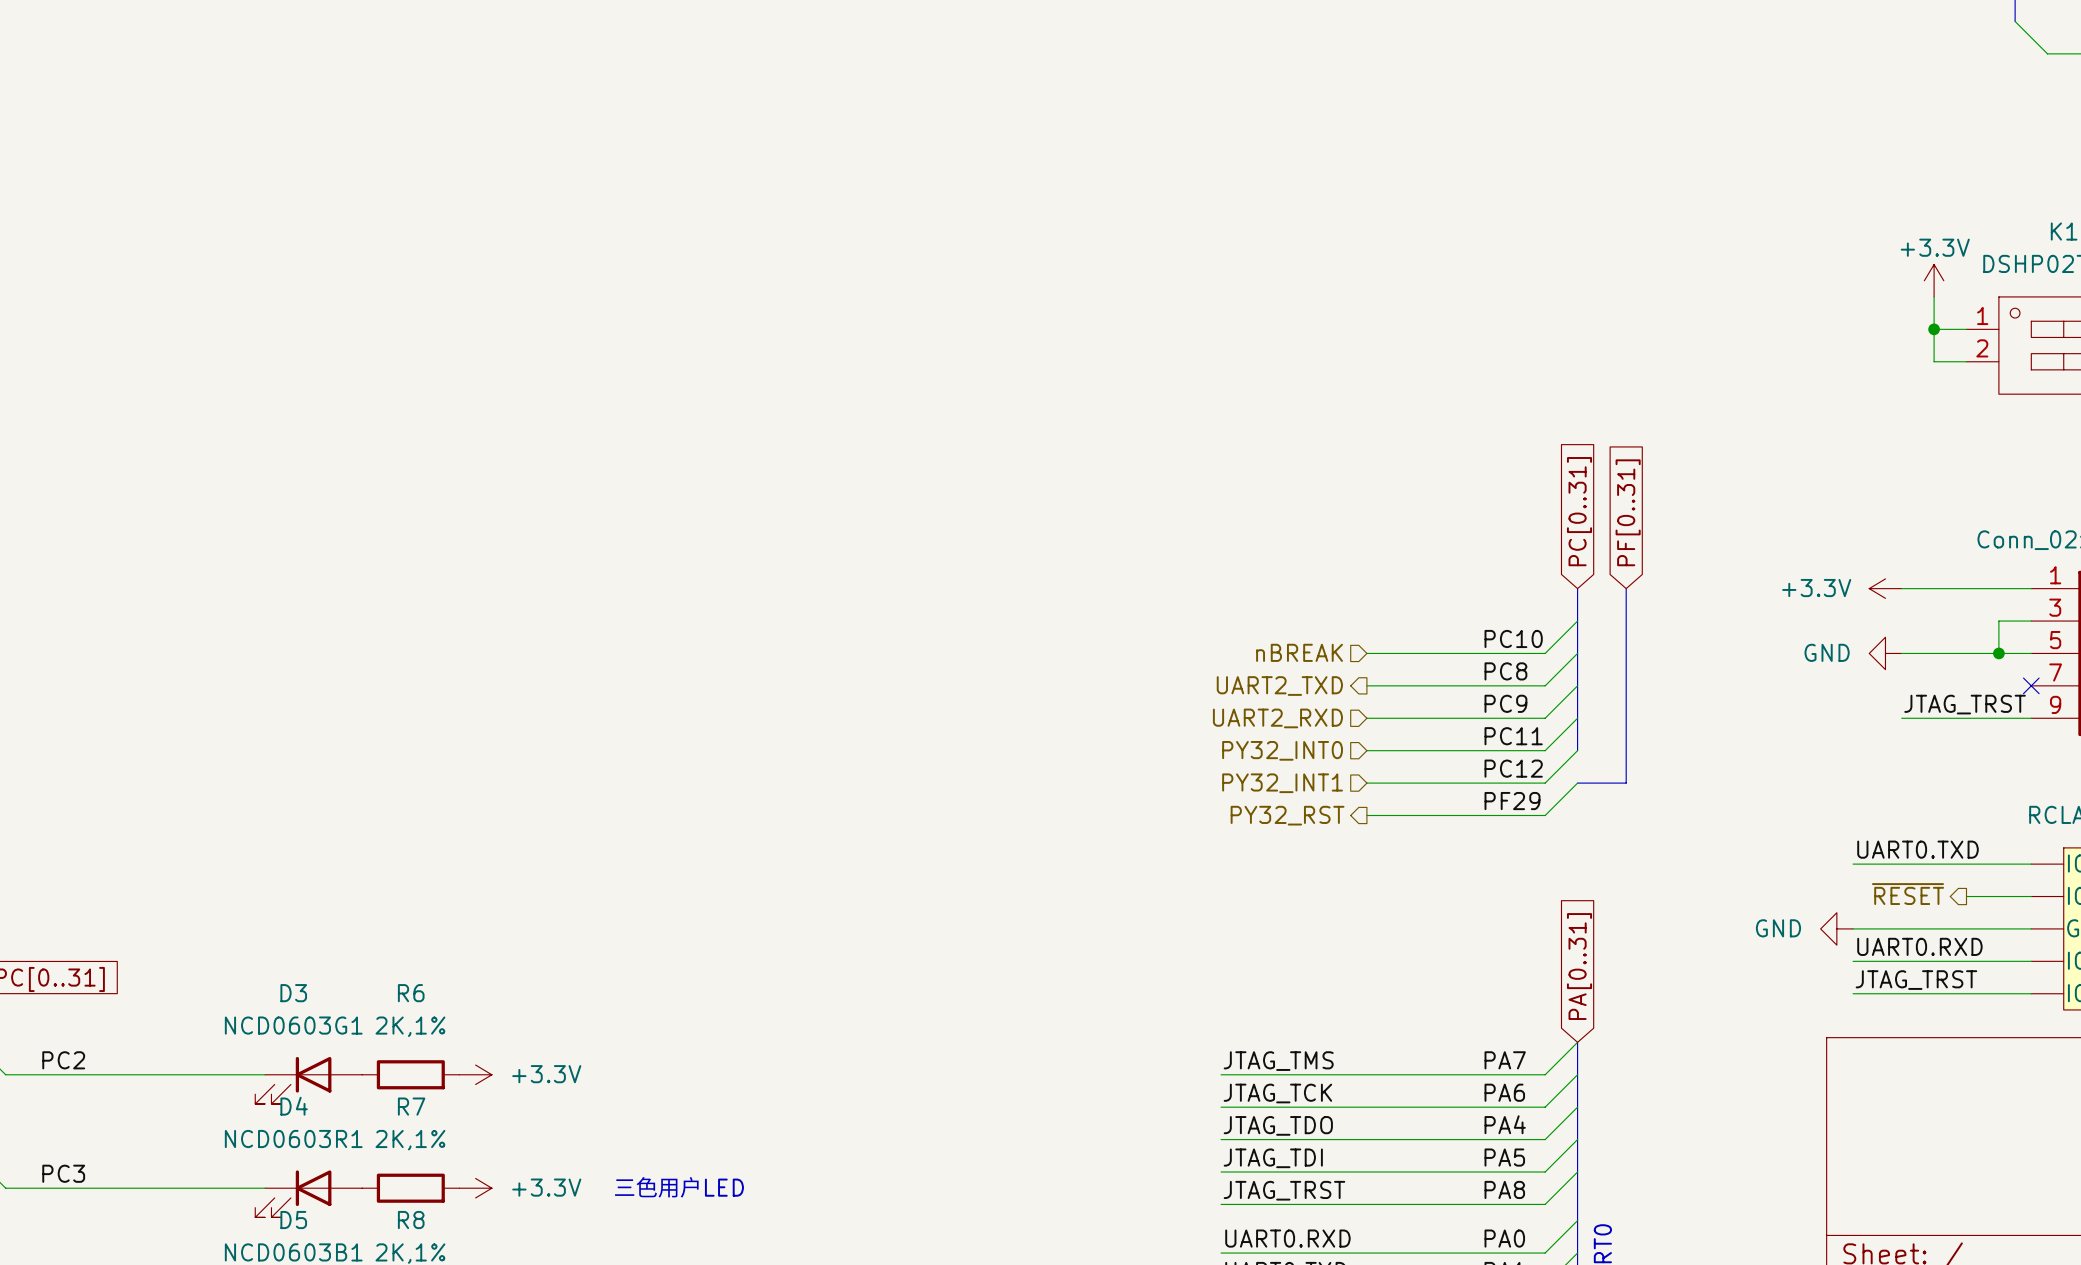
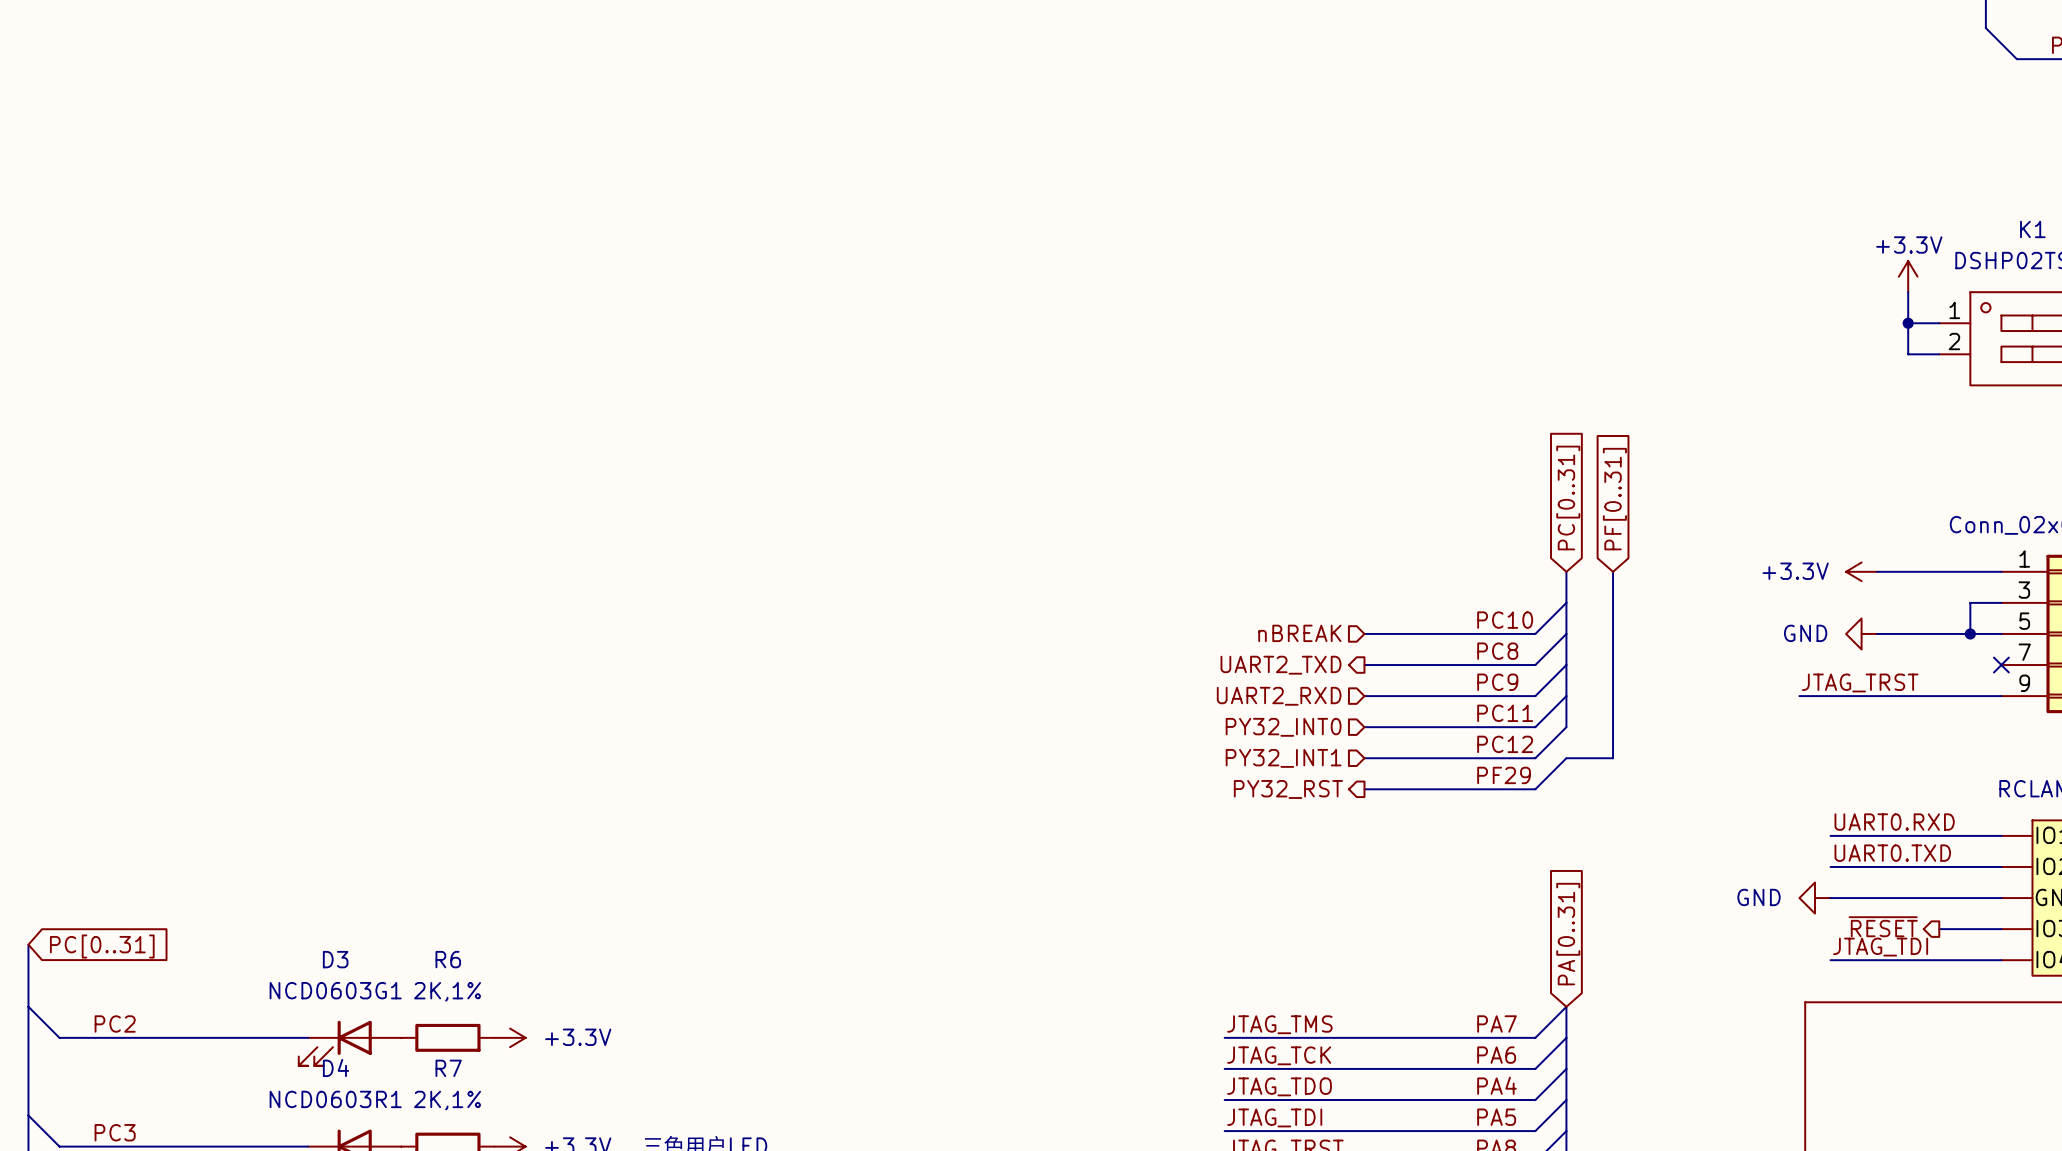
label position: JTAG_TRST (1965, 704) -> JTAG_TRST (1860, 682)
wire: none -> (1799, 696) (1877, 696)
label: UART0.TXD (1918, 849) -> UART0.RXD (1894, 822)
label: none -> UART0.TXD (1892, 853)
hierarchical label position: ~{RESET} (1908, 894) -> ~{RESET} (1883, 926)
label: UART0.RXD (1919, 946) -> none
wire: (1853, 961) (1966, 961) -> (1830, 866) (1939, 866)
label: JTAG_TRST (1916, 980) -> JTAG_TDI (1880, 947)

